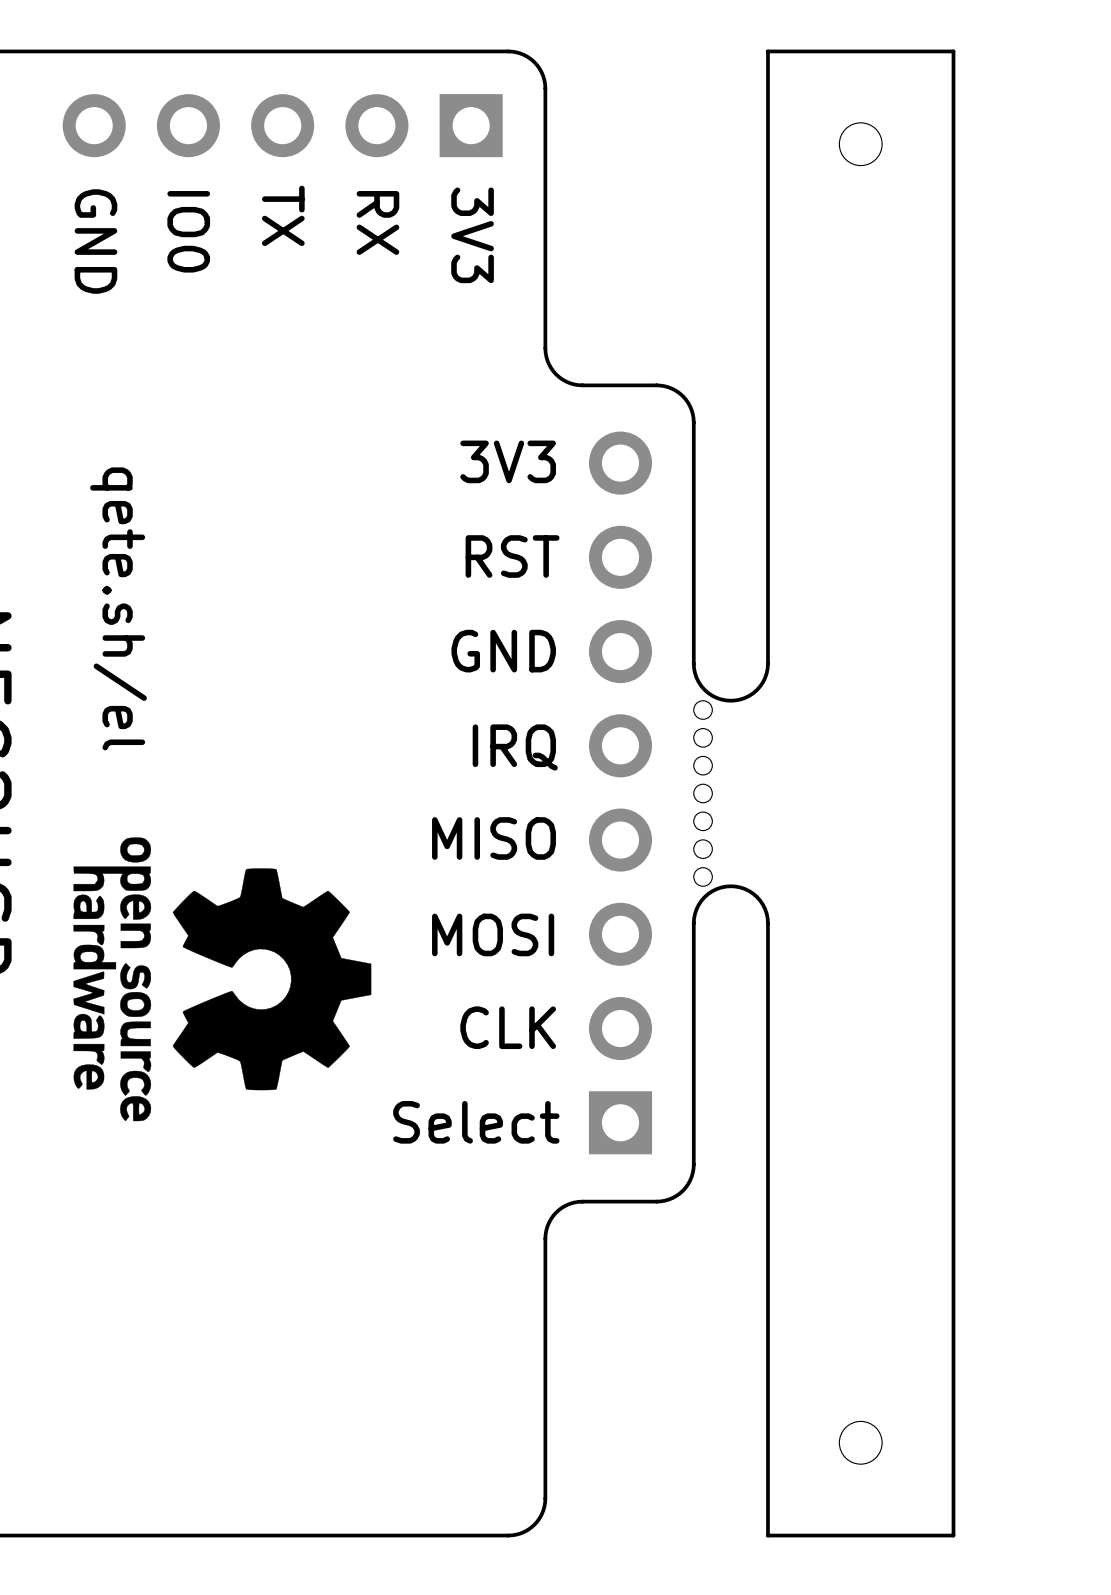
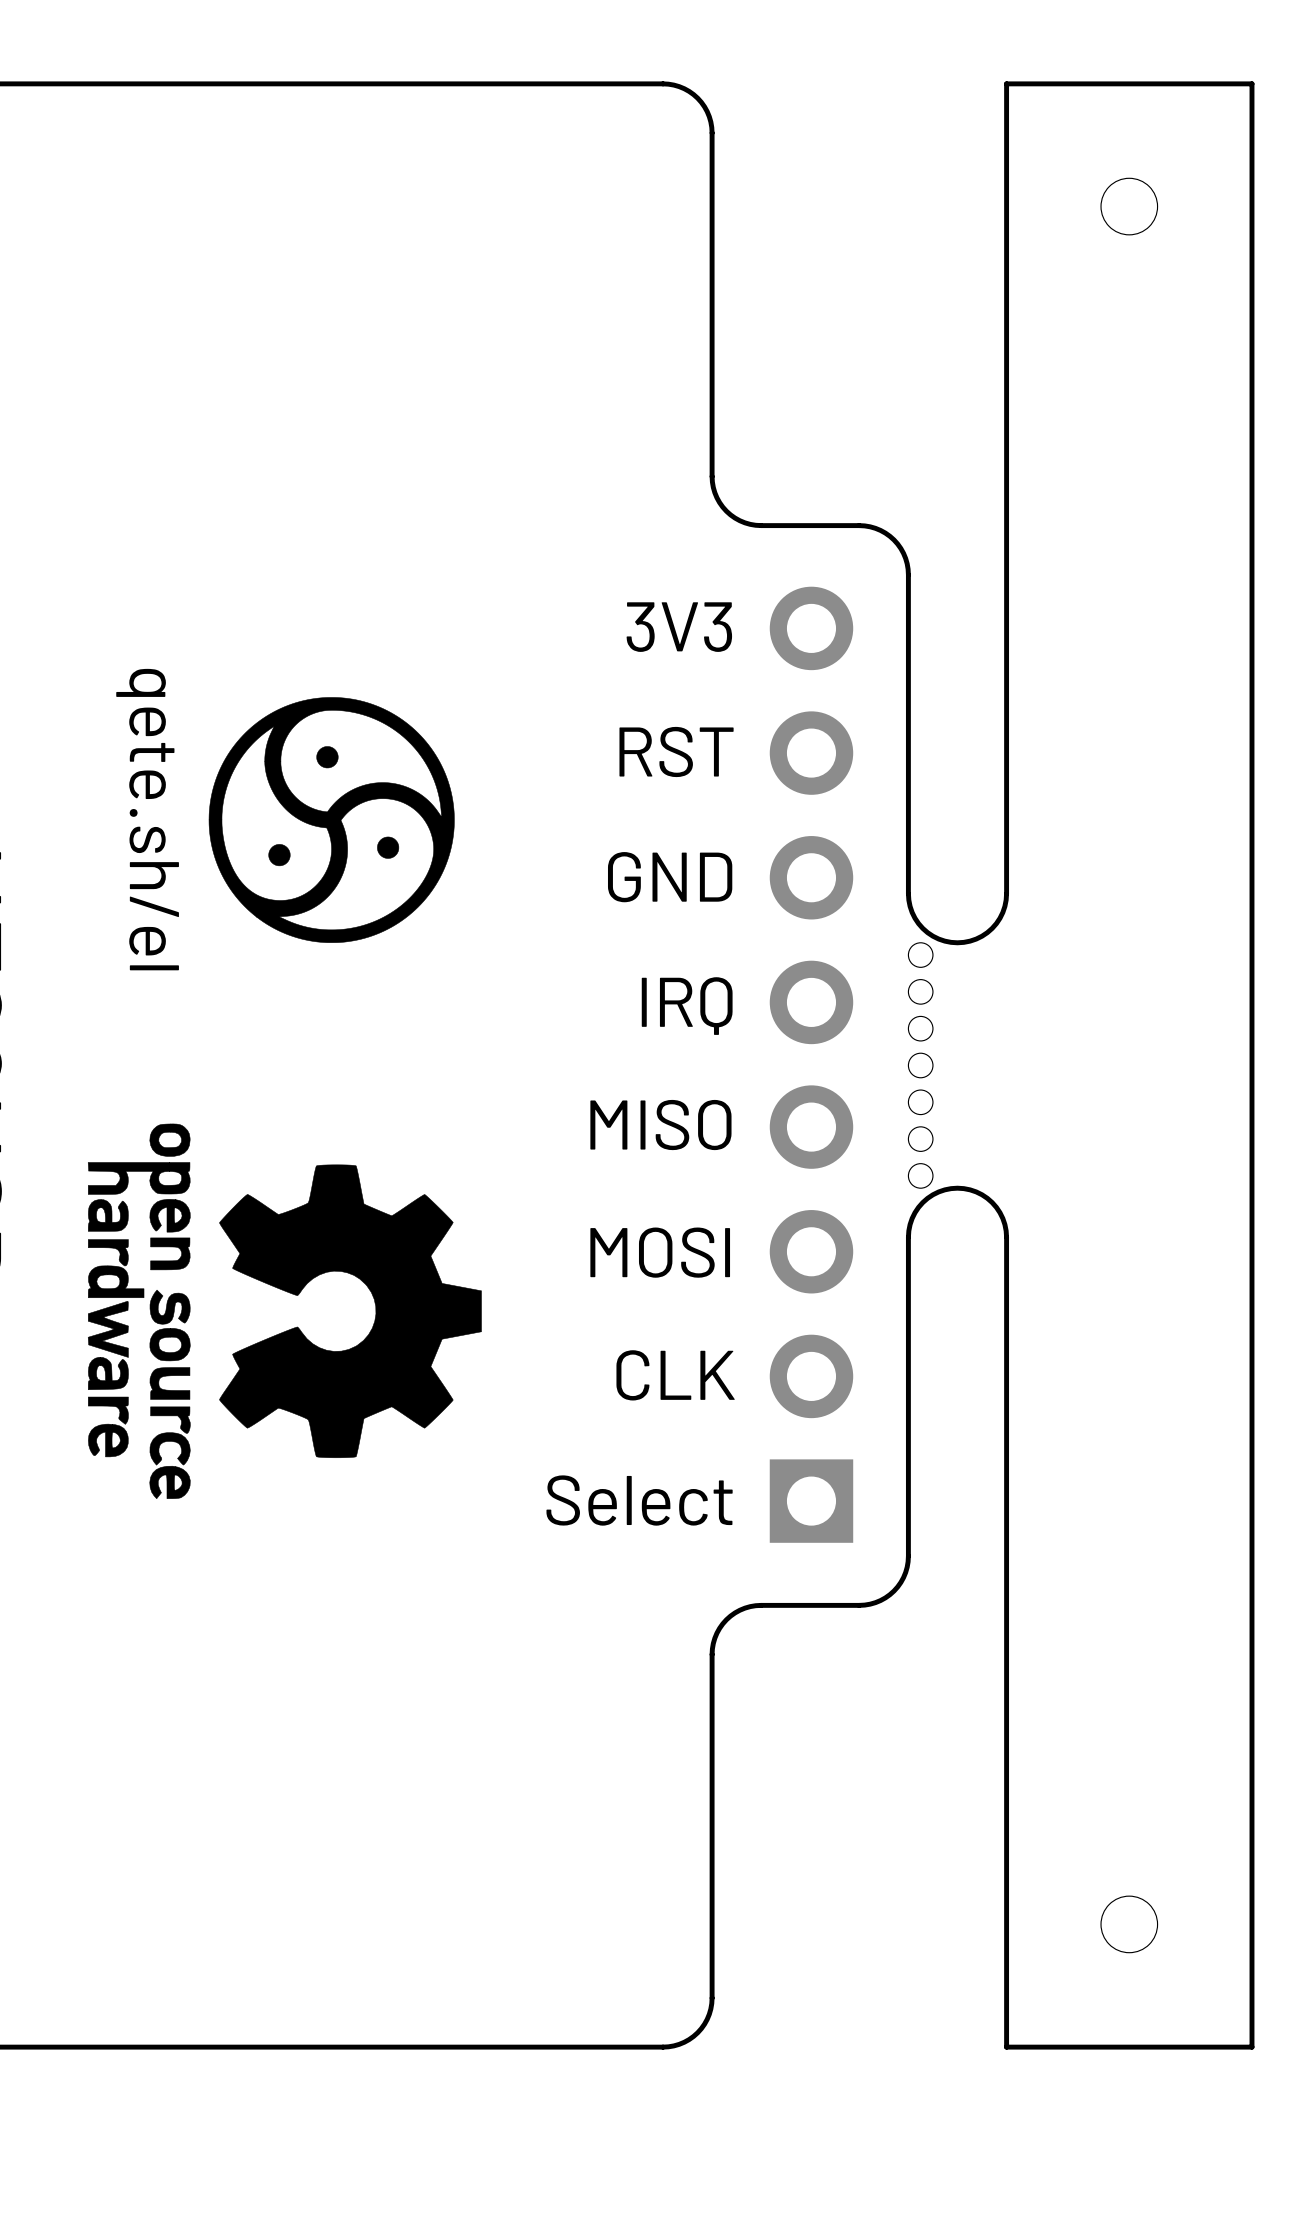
part: (282, 125) -> none
text: TX (283, 215) -> none
text: RX (377, 222) -> none
text: IO0 (188, 231) -> none
text: 3V3 (472, 235) -> none
text: GND (95, 241) -> none
drawing: none -> [208, 697, 455, 943]

